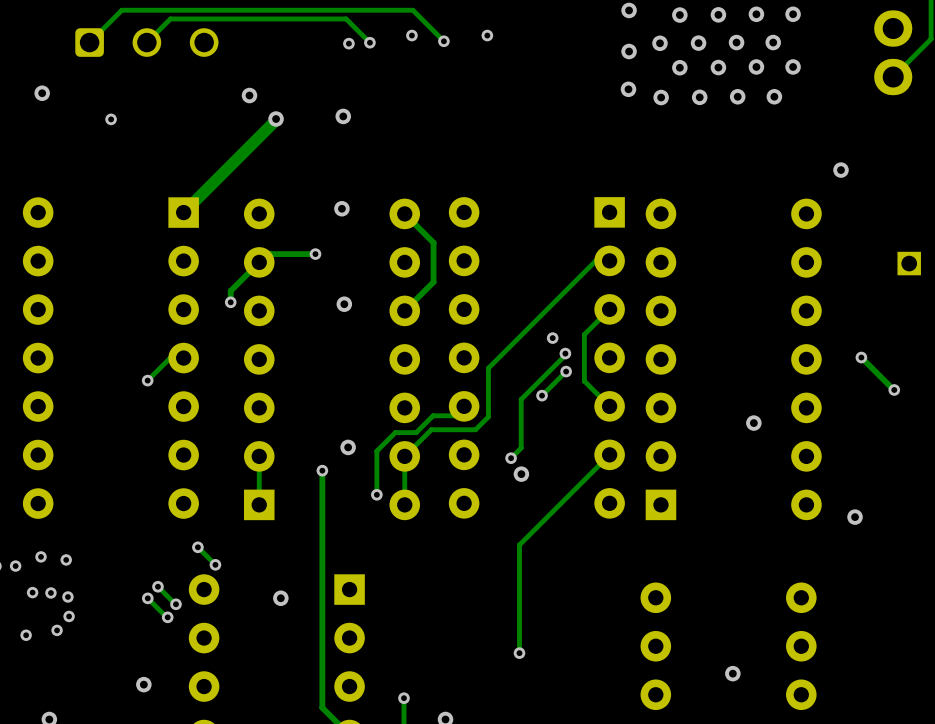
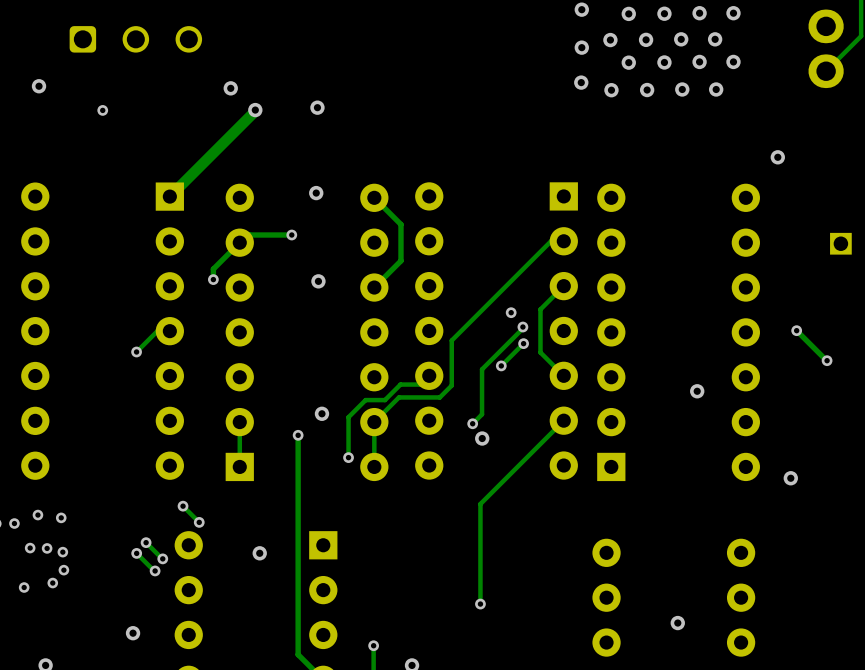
via: (411, 35) -> none
via: (487, 35) -> none
track: (443, 41) (412, 10) (121, 10) (89, 42) -> none
via: (443, 41) -> none
track: (146, 42) (170, 18) (346, 18) (369, 42) -> none
via: (369, 42) -> none
via: (348, 43) -> none

